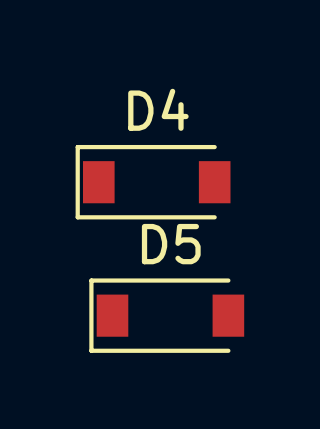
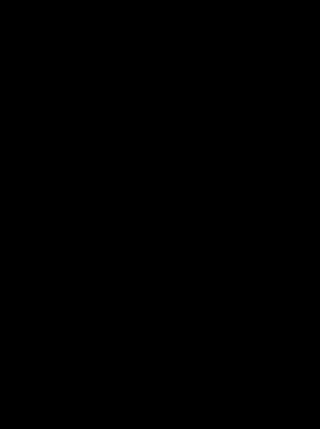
D4: (153, 182) -> none
D5: (166, 315) -> none

